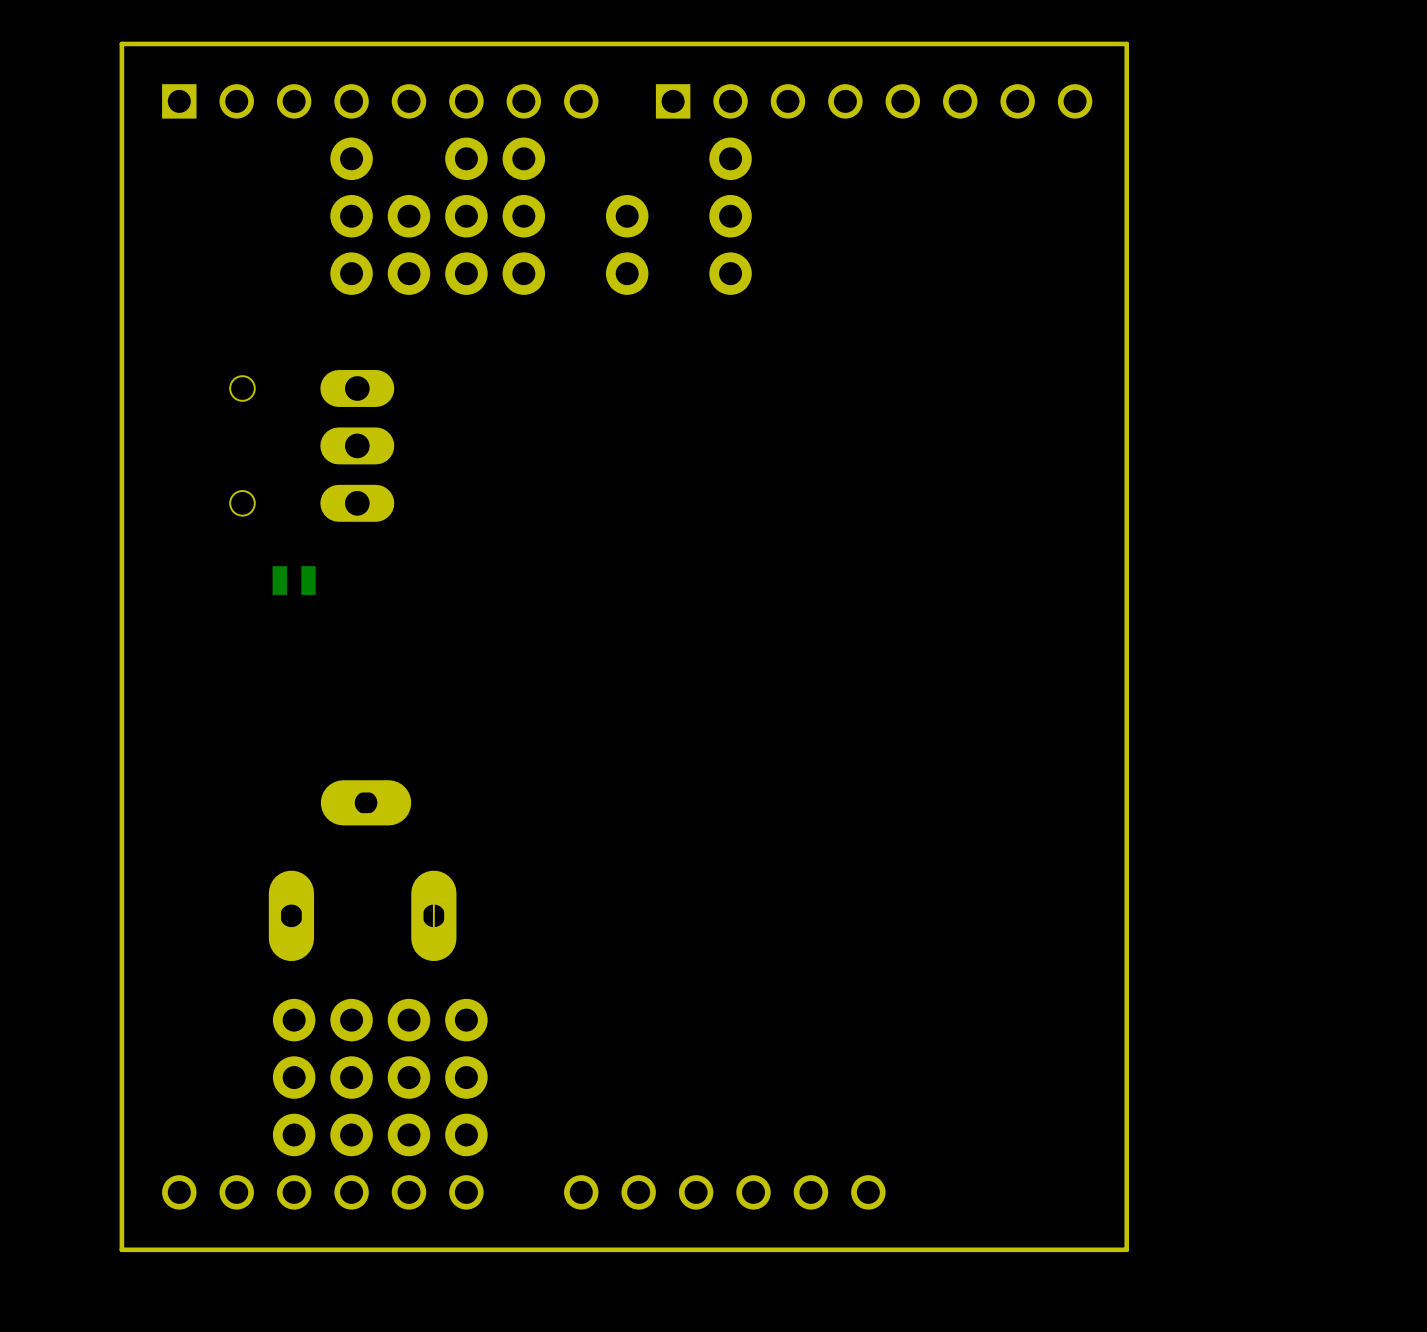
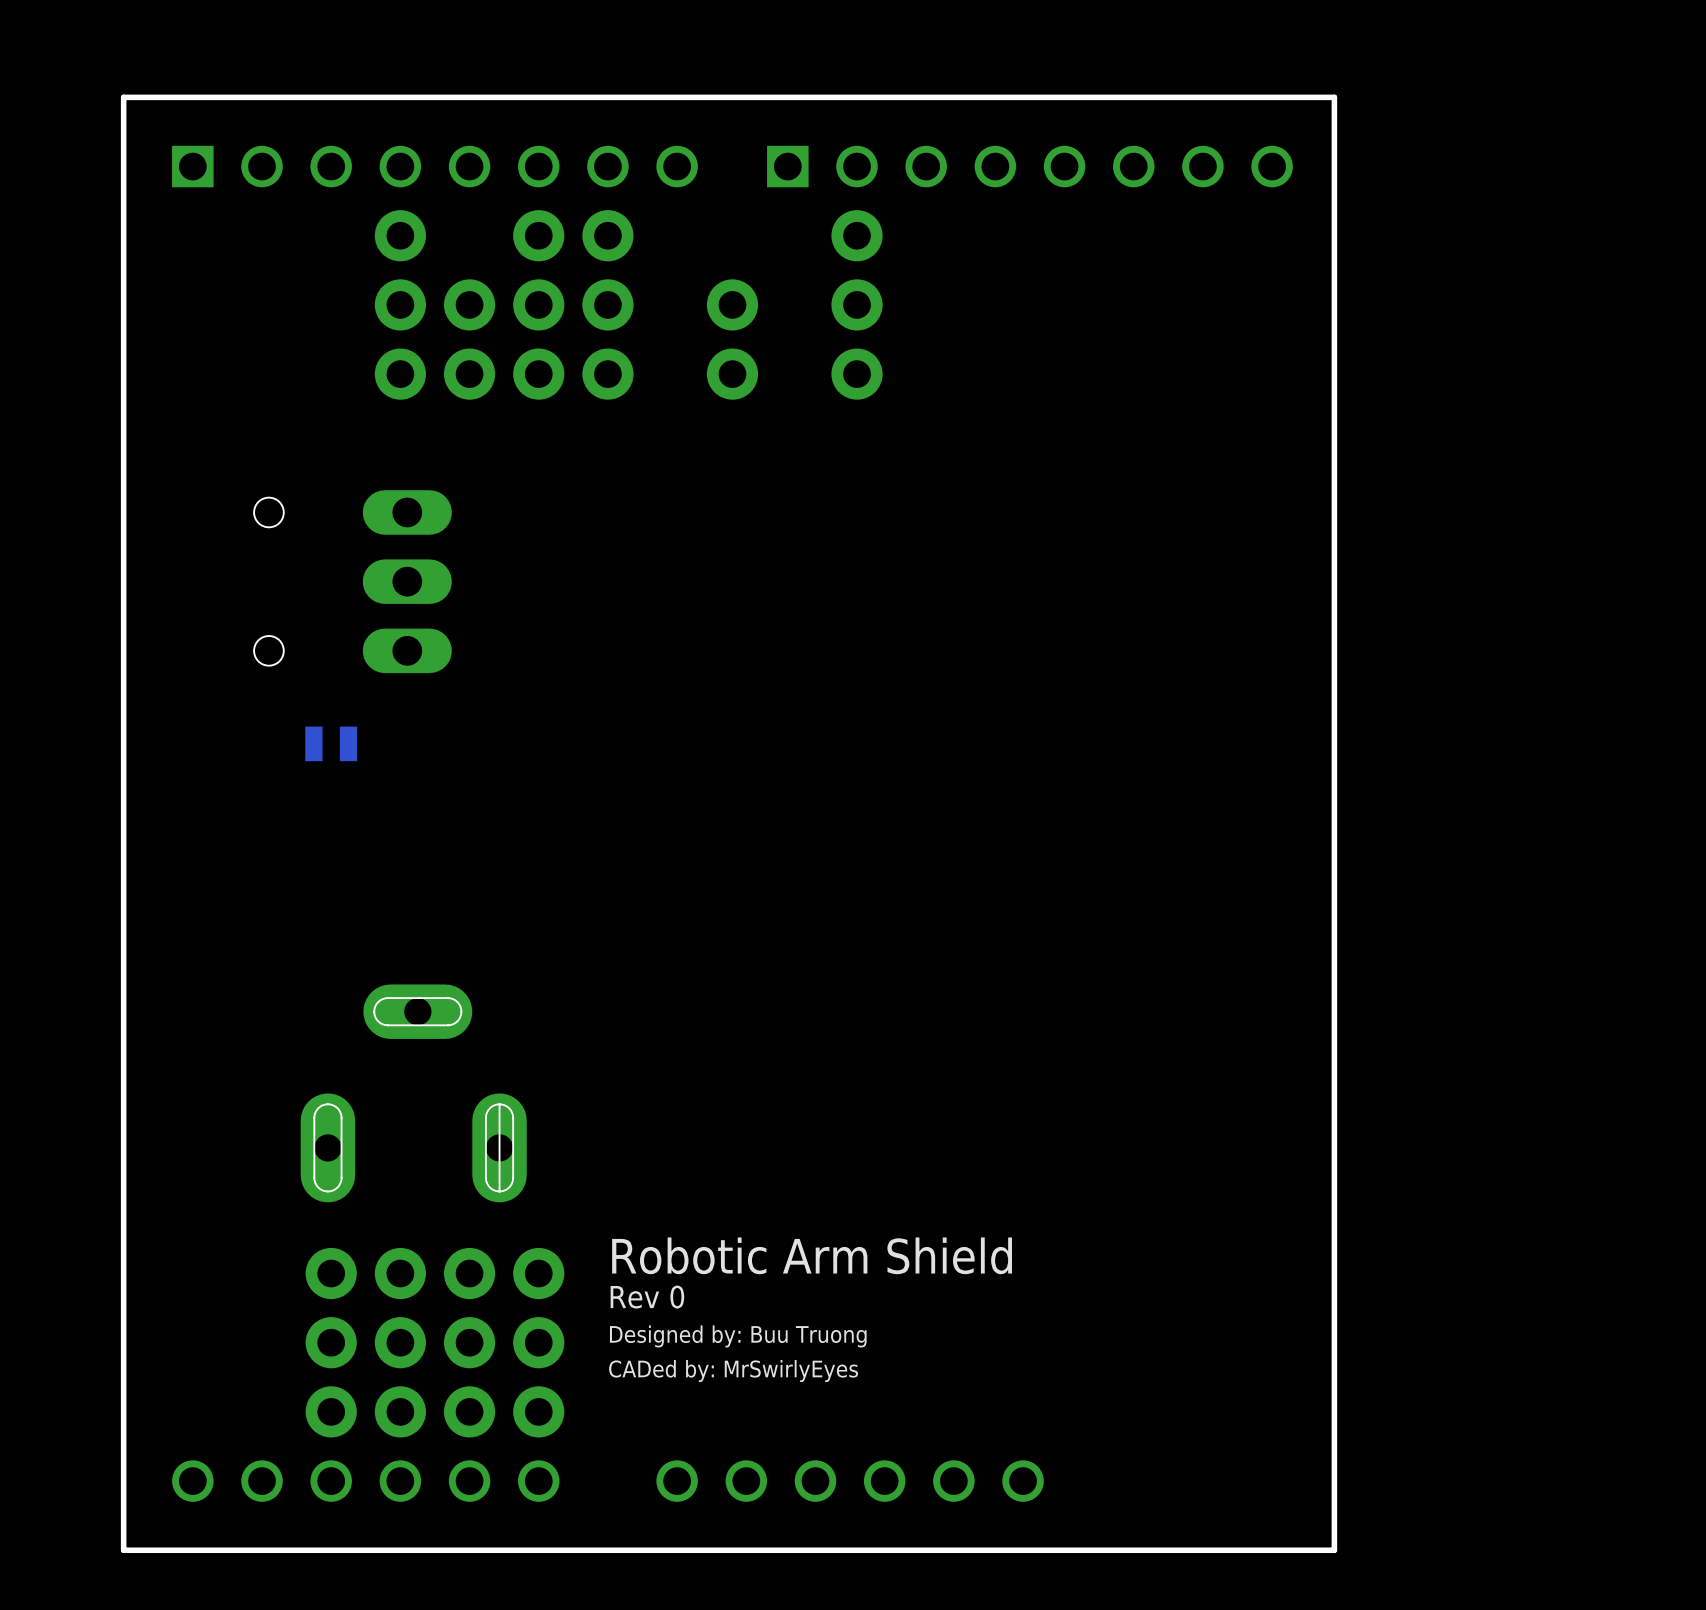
text: none -> Robotic Arm Shield (812, 1255)
text: none -> Rev 0 (647, 1297)
text: none -> Designed by: Buu Truong (738, 1336)
text: none -> CADed by: MrSwirlyEyes (733, 1371)

